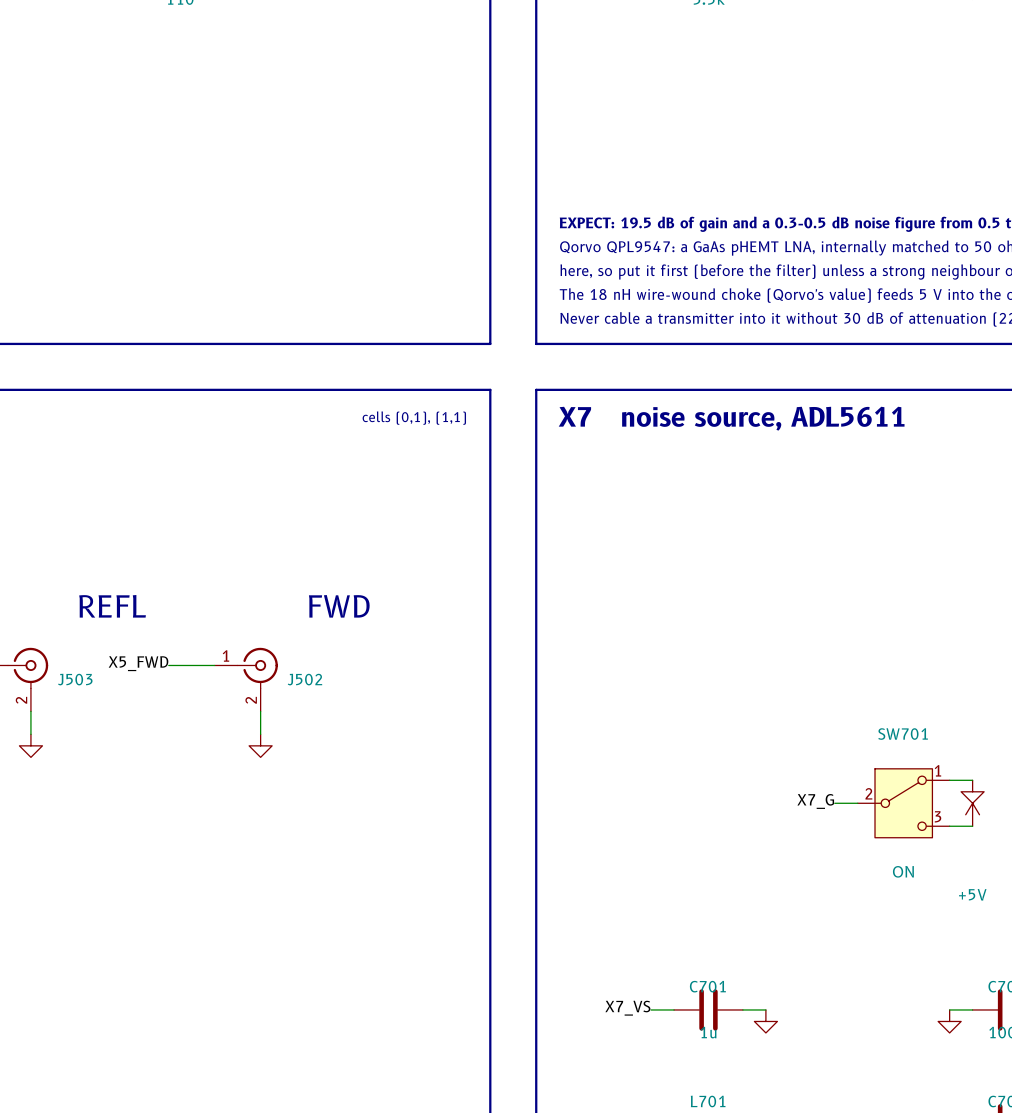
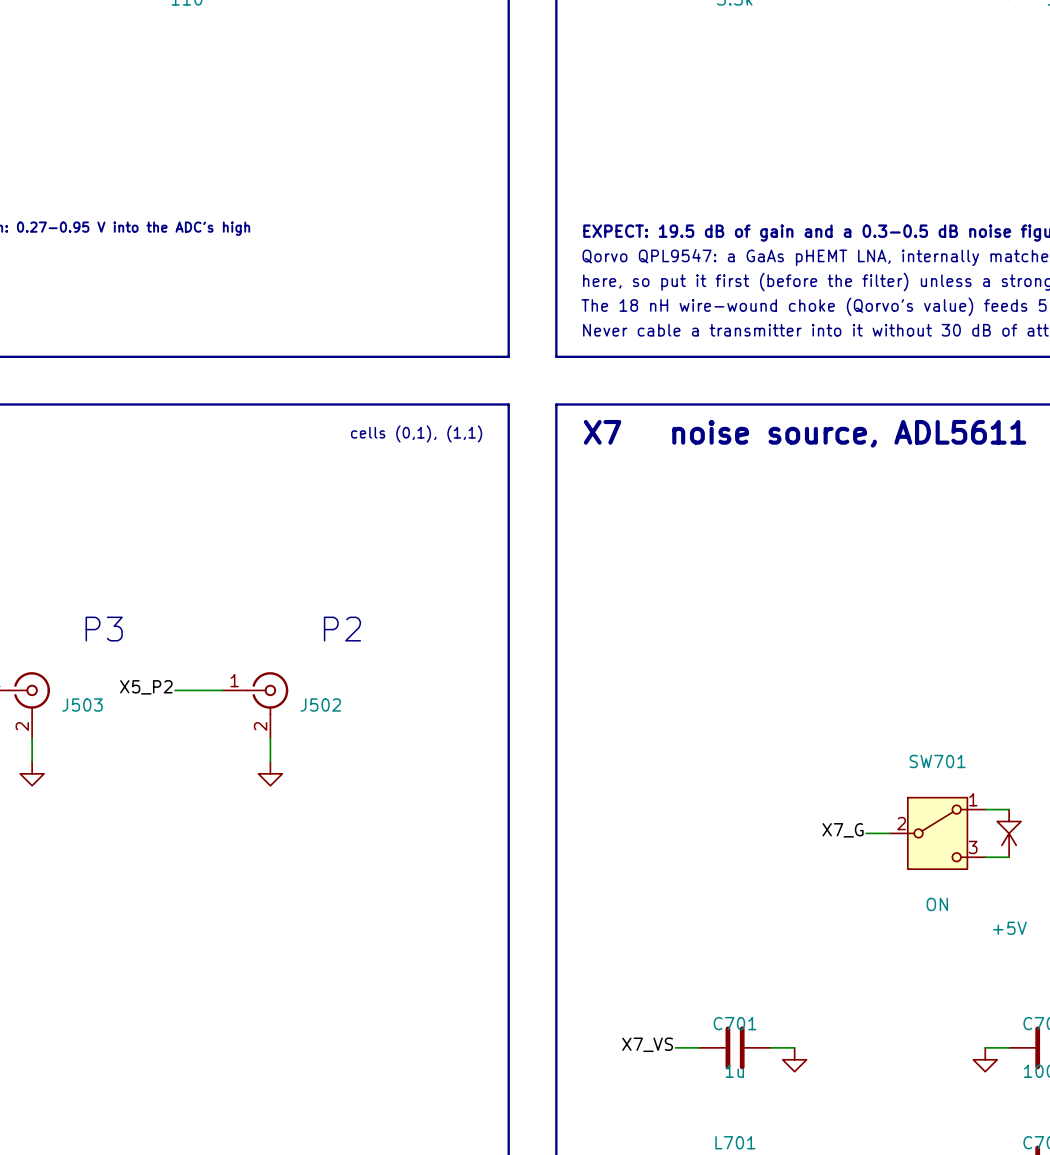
text: REFL (112, 606) -> P3 (104, 629)
text: FWD (339, 606) -> P2 (342, 629)
label: X5_FWD (138, 663) -> X5_P2 (146, 687)

